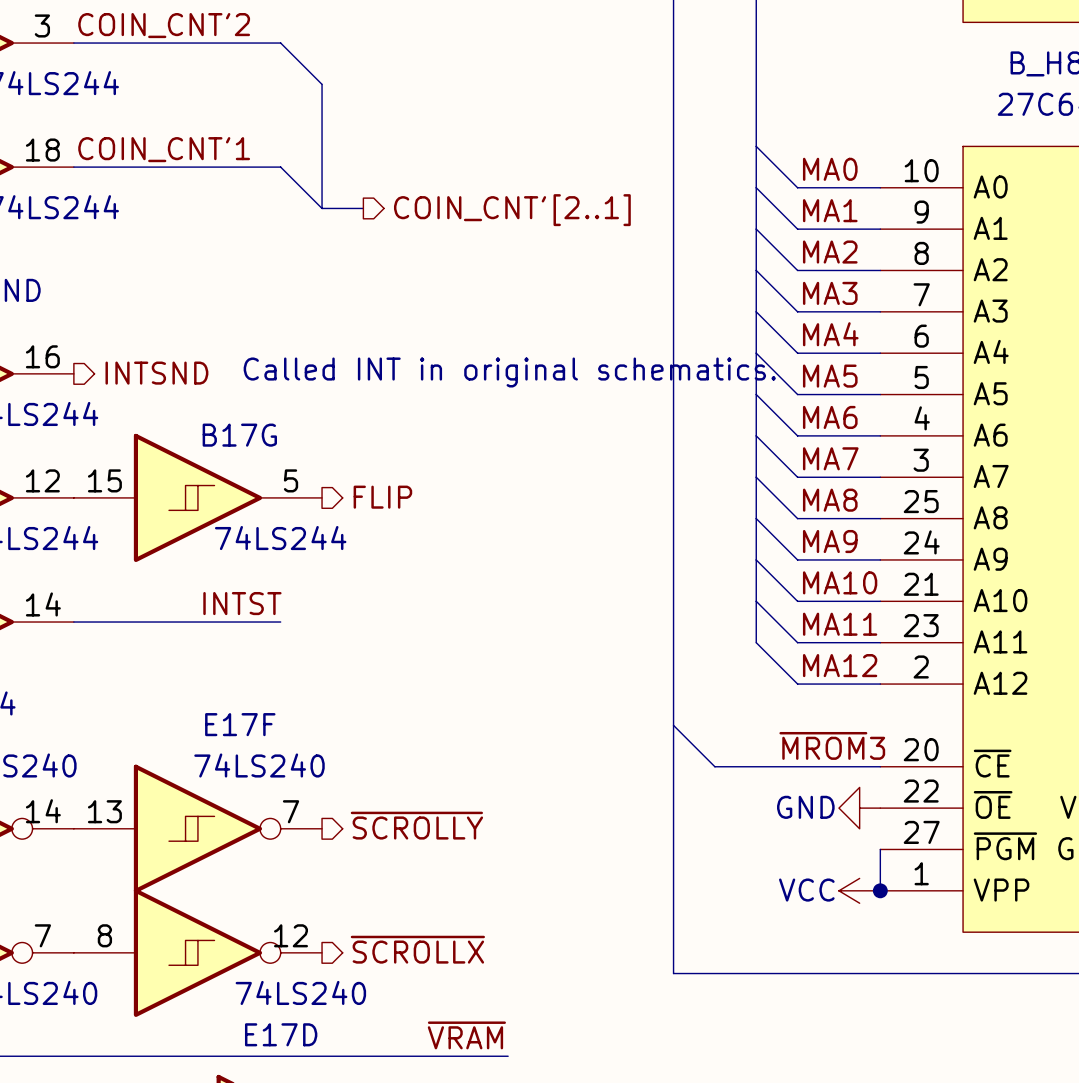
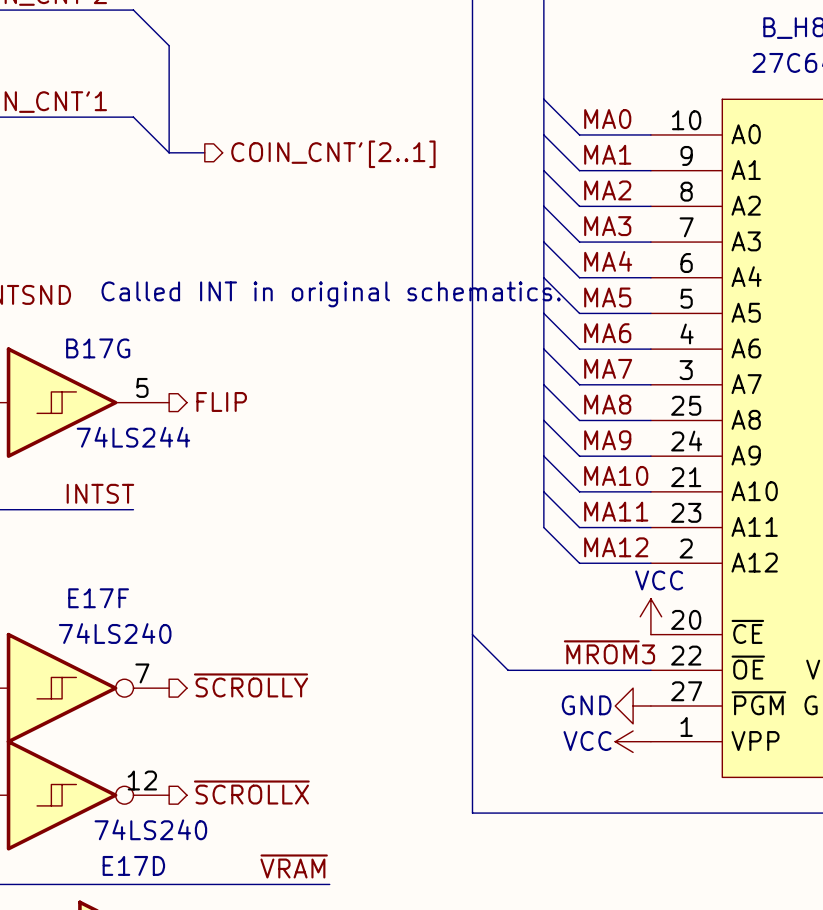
wire: (673, 725) (714, 766) (880, 766) -> (472, 634) (508, 670) (650, 670)
label position: ~{MROM}3 (832, 745) -> ~{MROM}3 (609, 652)
power symbol: none -> VCC (650, 616)
power symbol position: GND (859, 808) -> GND (633, 706)
wire: (880, 849) (880, 890) -> none
junction: (880, 890) -> none

